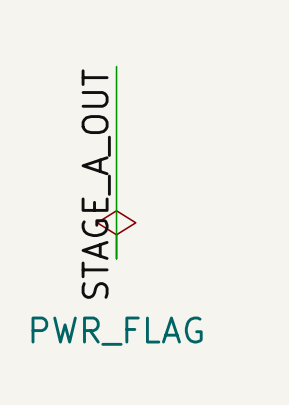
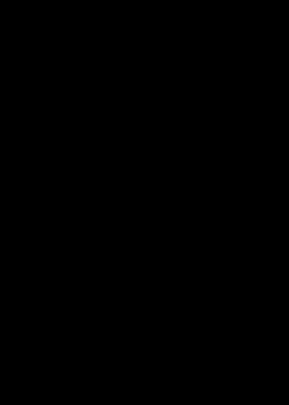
wire: (116, 66) (116, 258) -> none
label: STAGE_A_OUT (96, 184) -> none
power symbol: PWR_FLAG (116, 234) -> none

